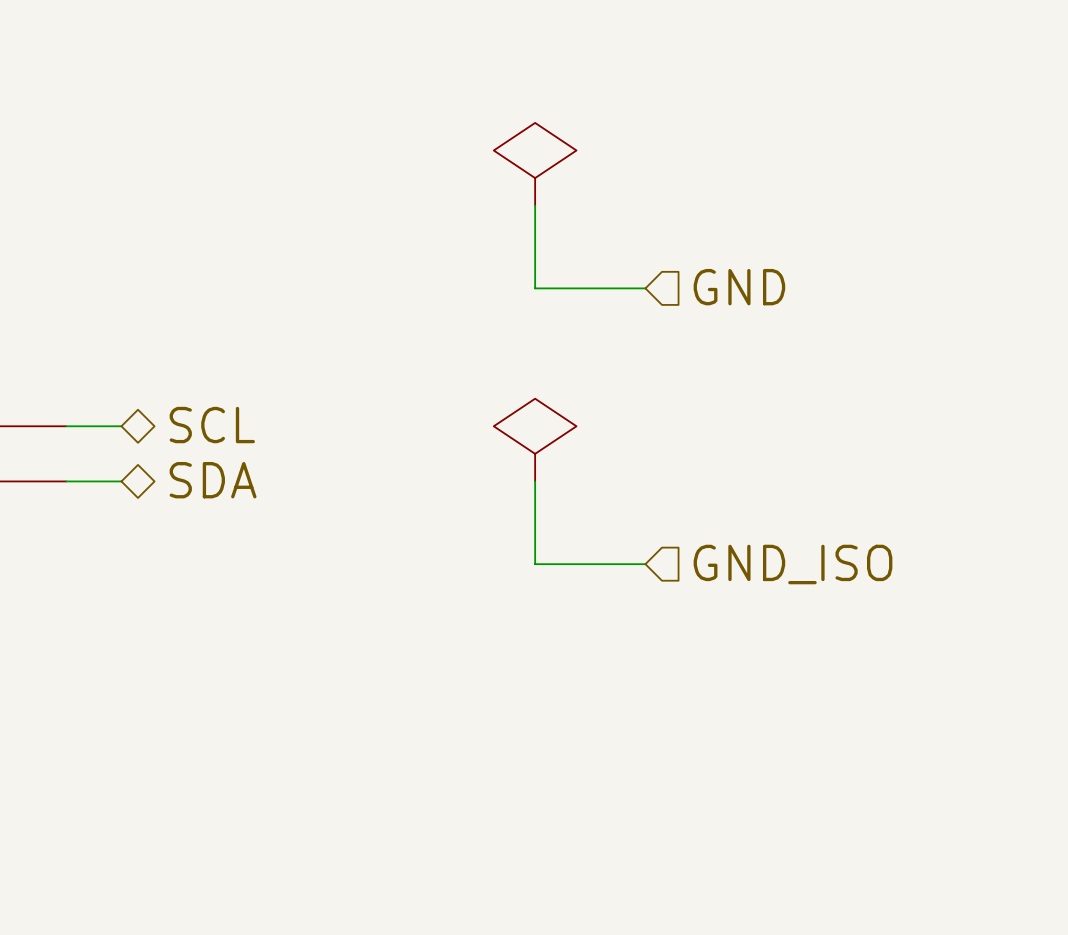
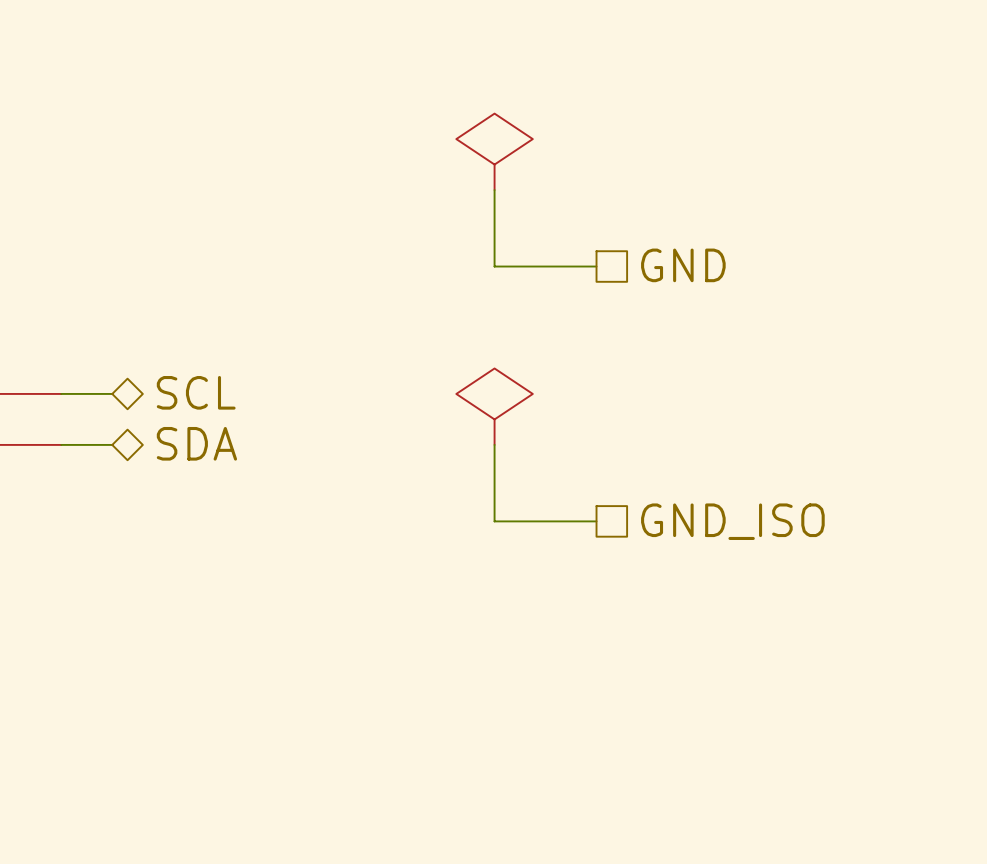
hierarchical label shape: input (739, 287) -> passive (683, 265)
hierarchical label shape: input (793, 564) -> passive (732, 521)

